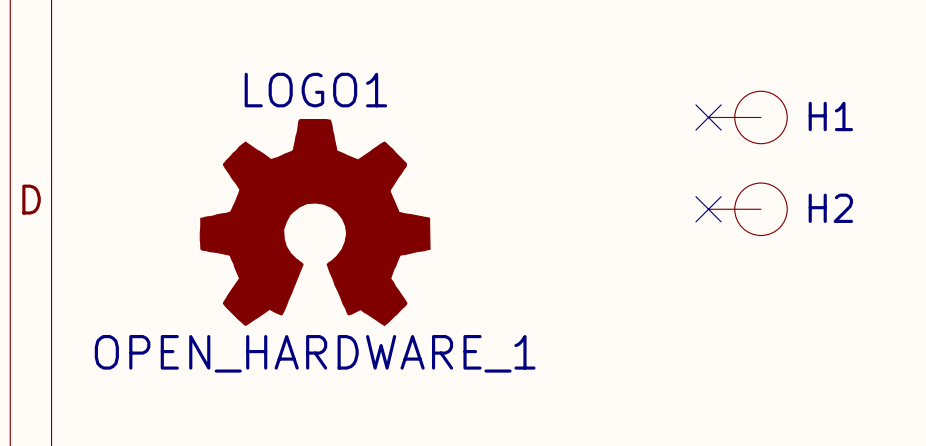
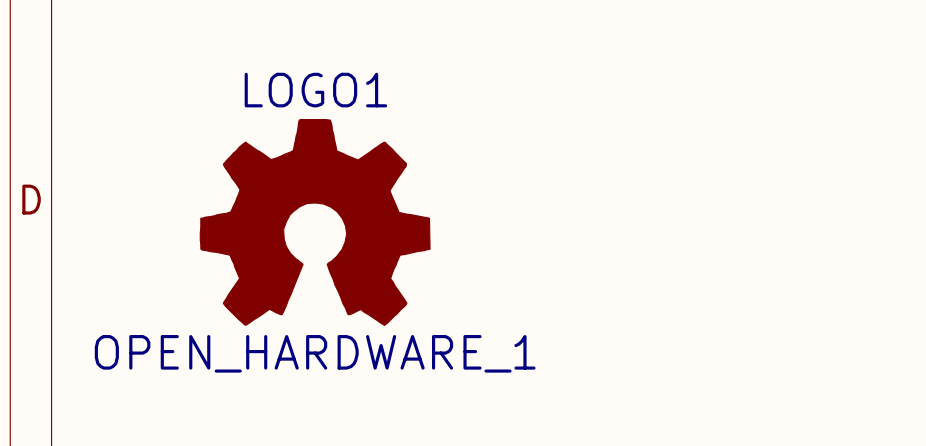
no-connect mark: (708, 117) -> none
H1: (747, 117) -> none
no-connect mark: (708, 209) -> none
H2: (747, 209) -> none

